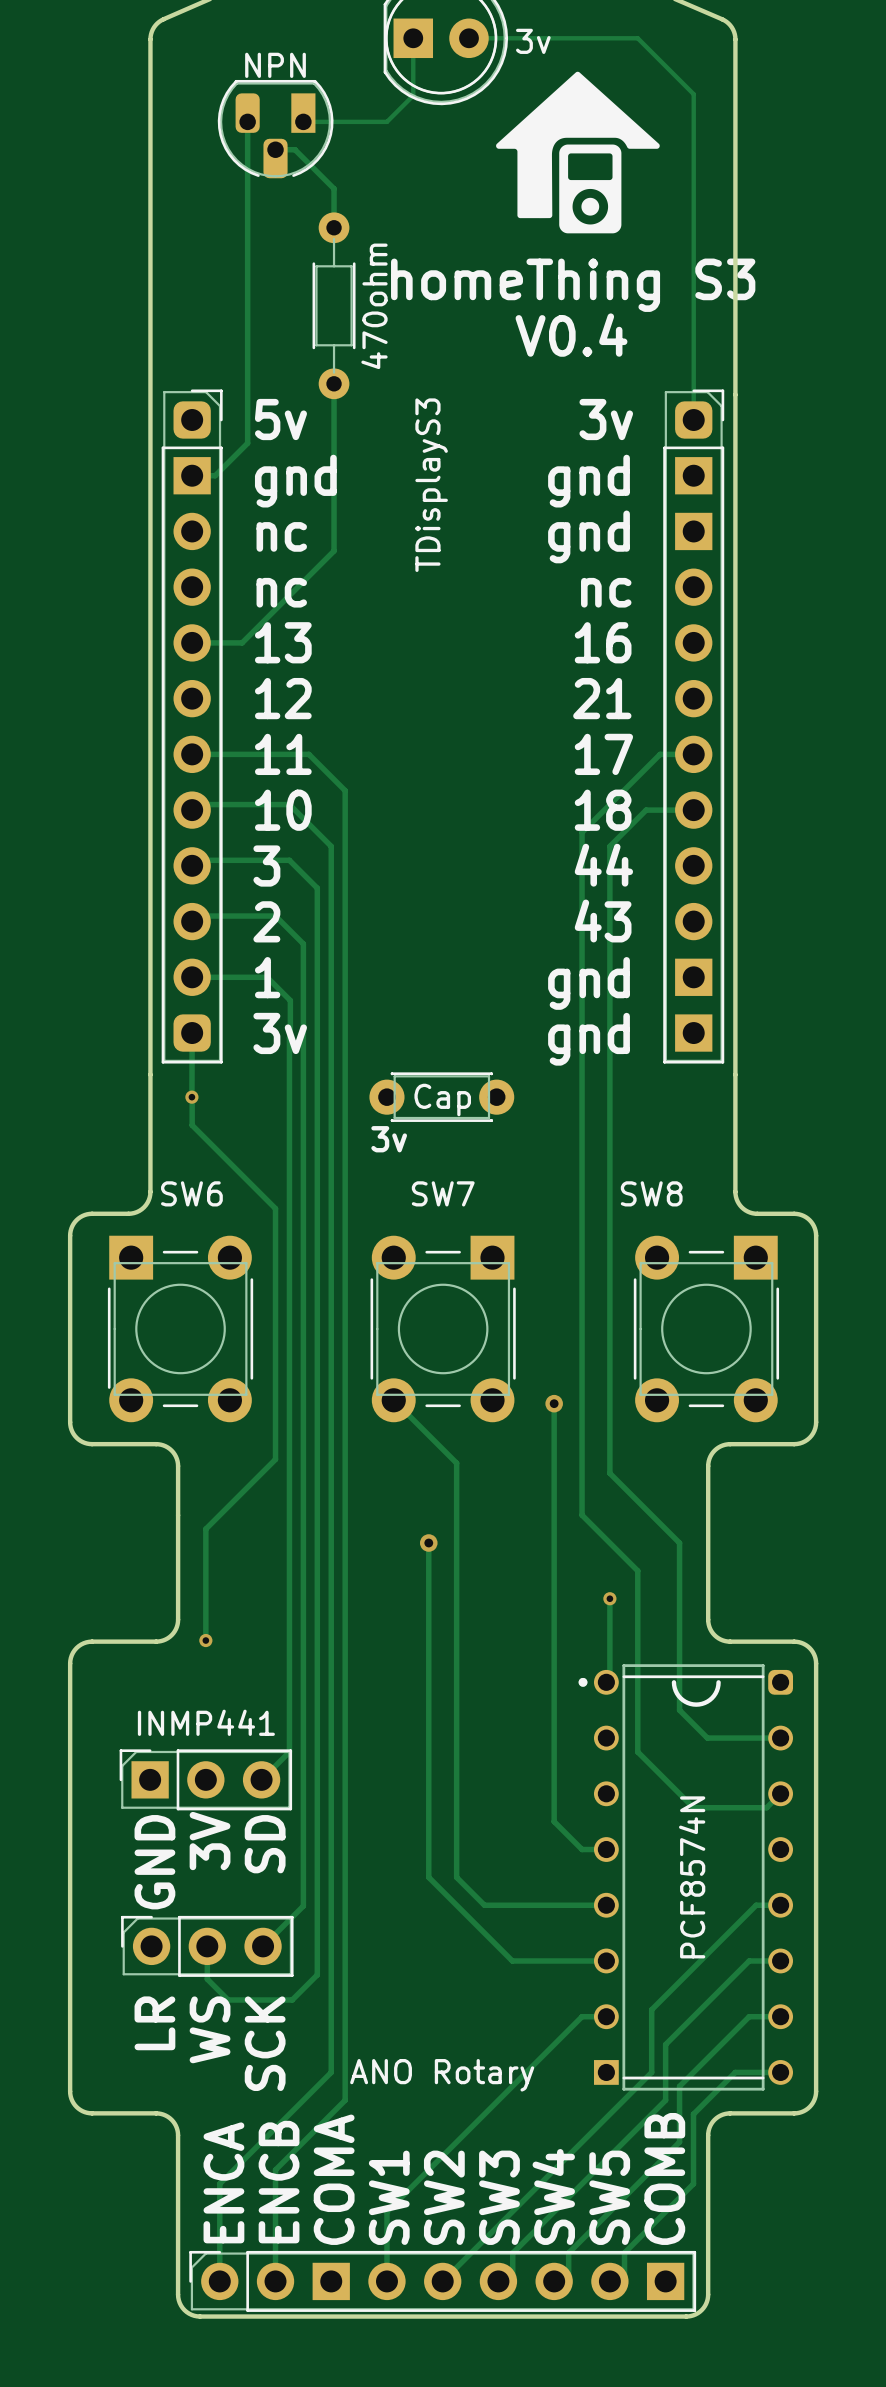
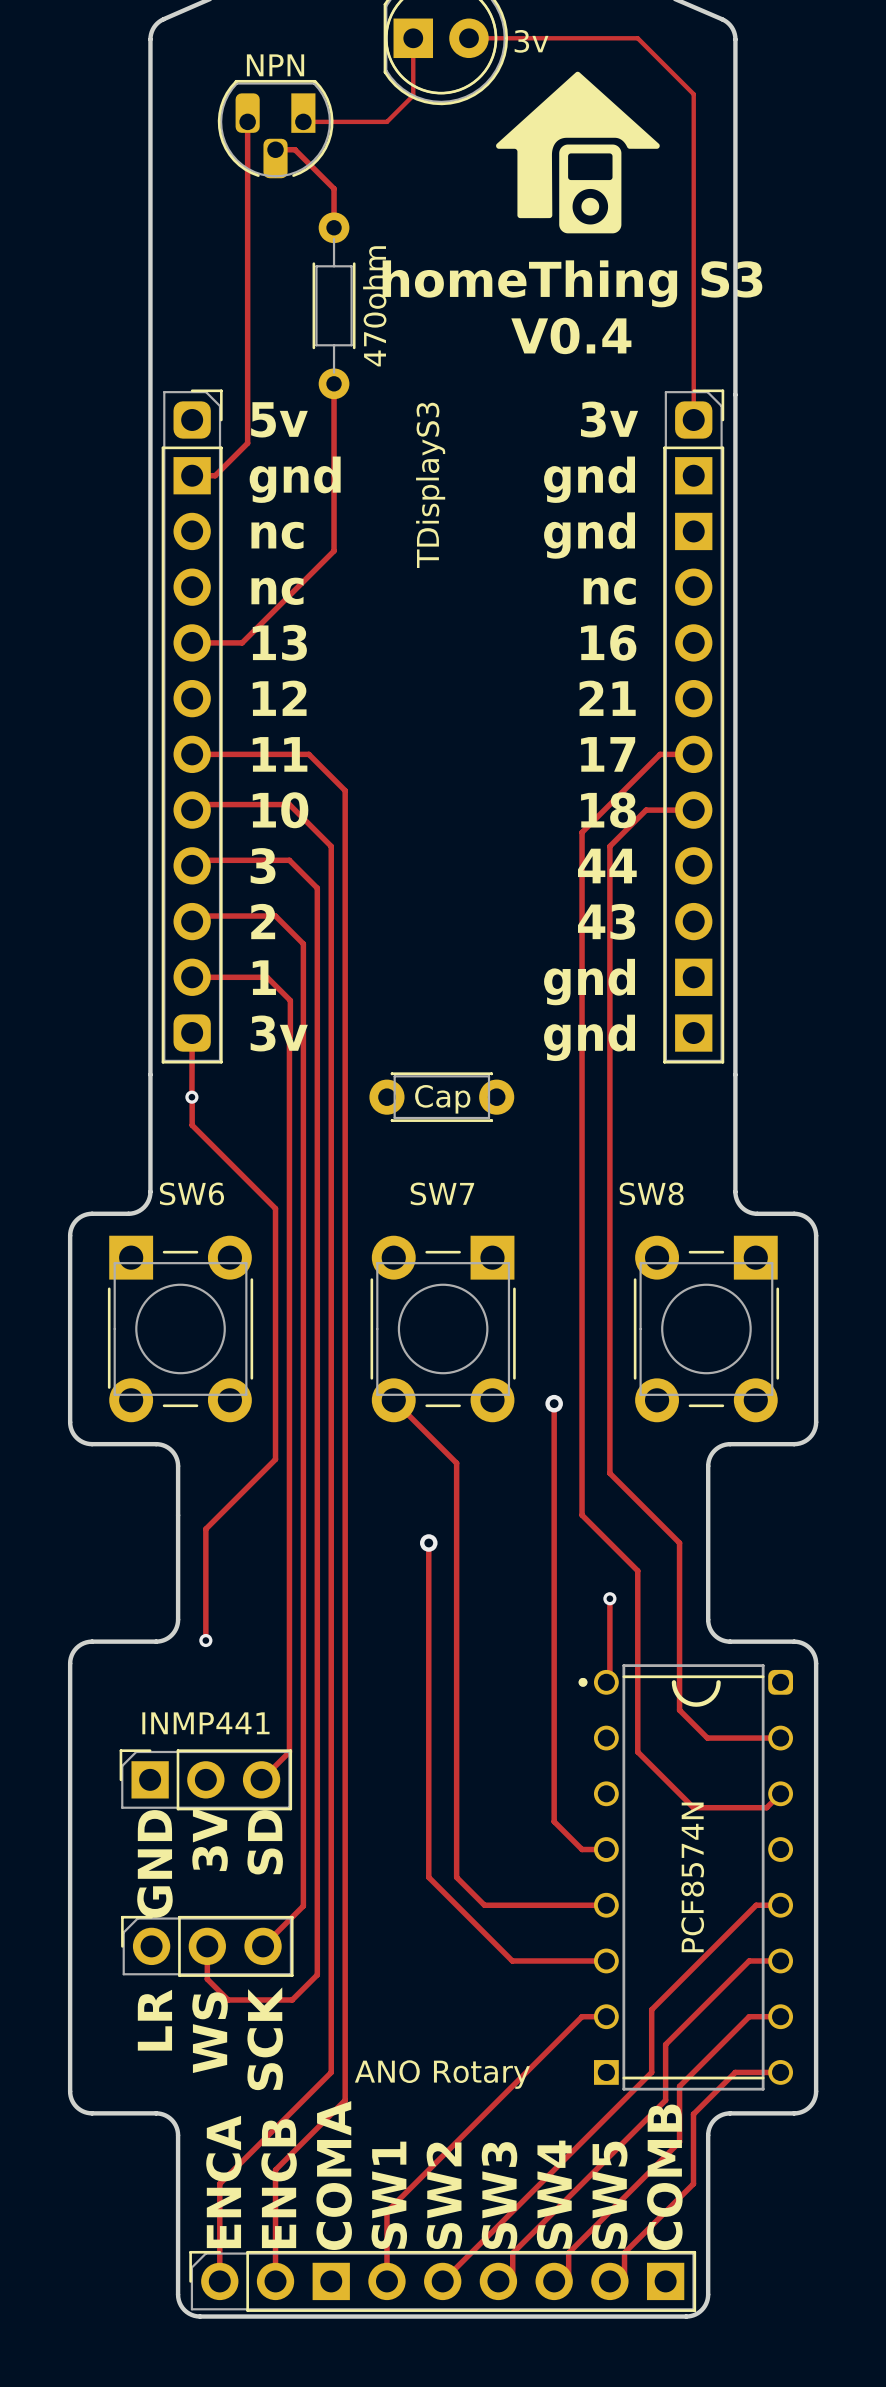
text: 3v (389, 1139) -> none

